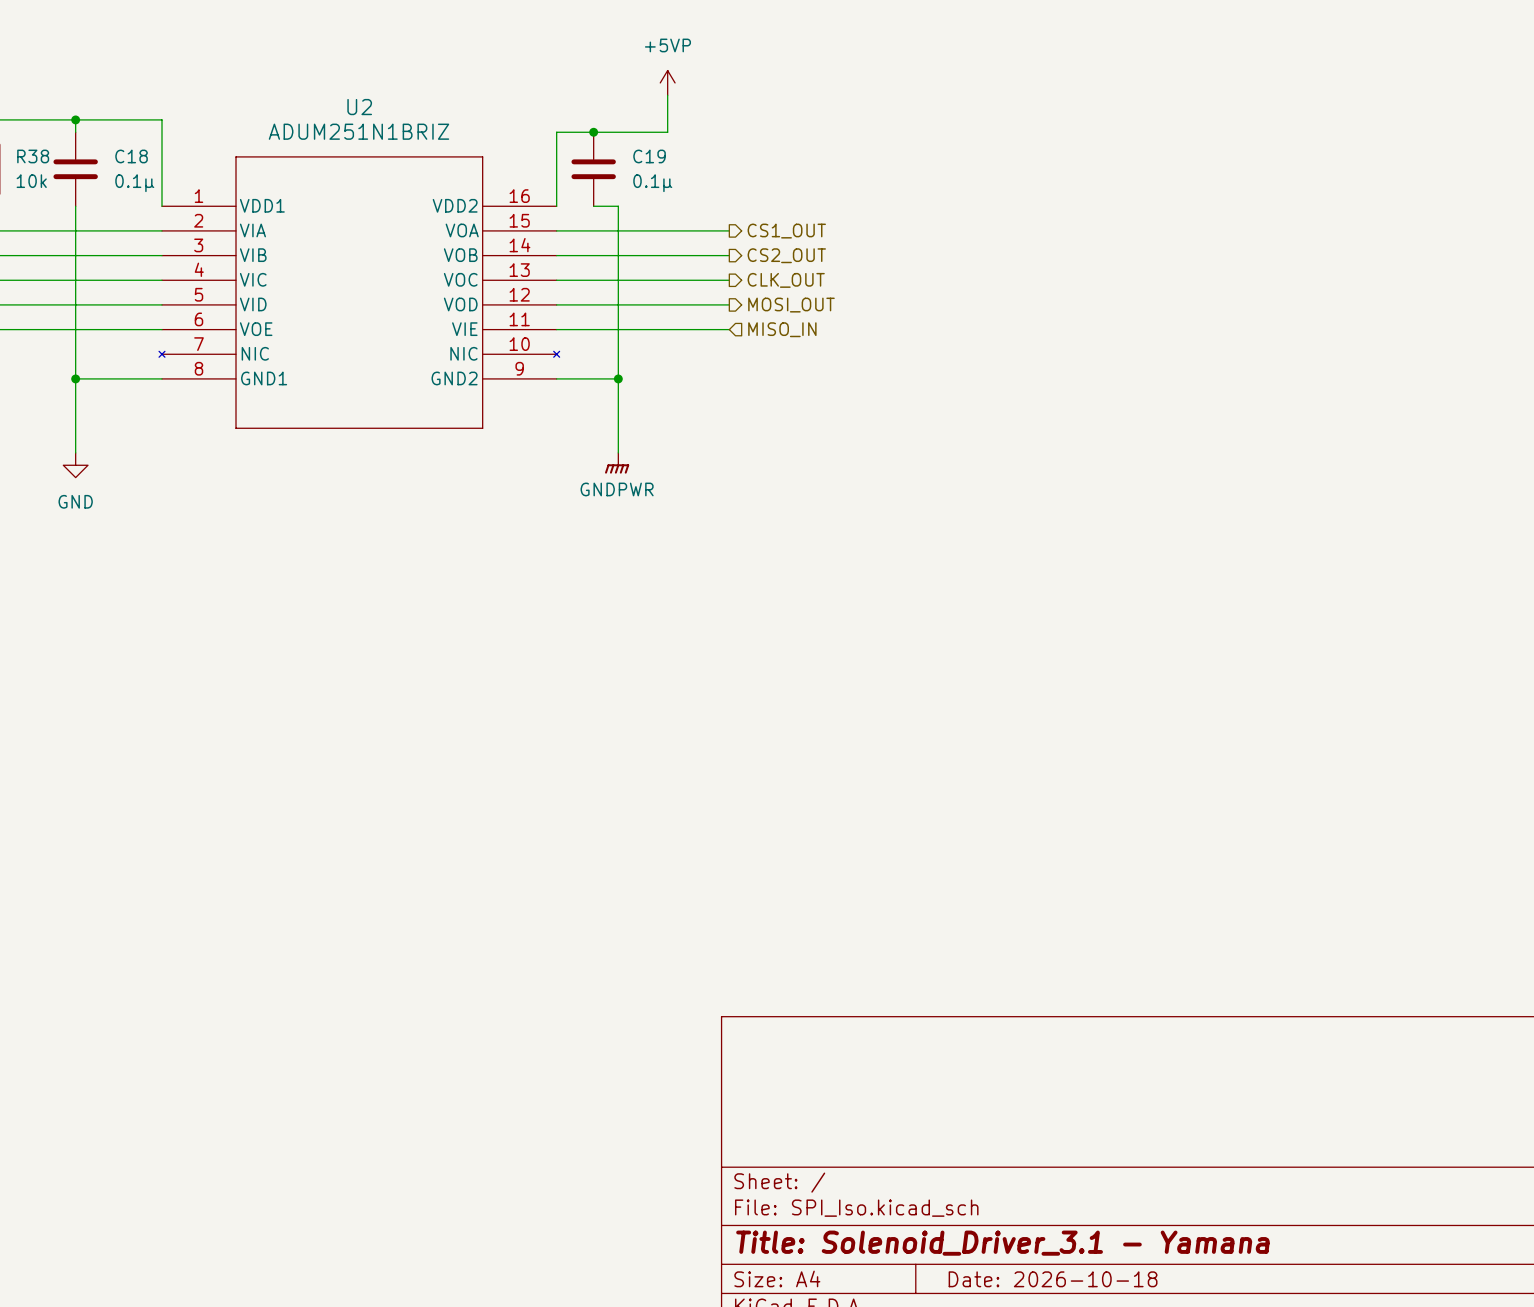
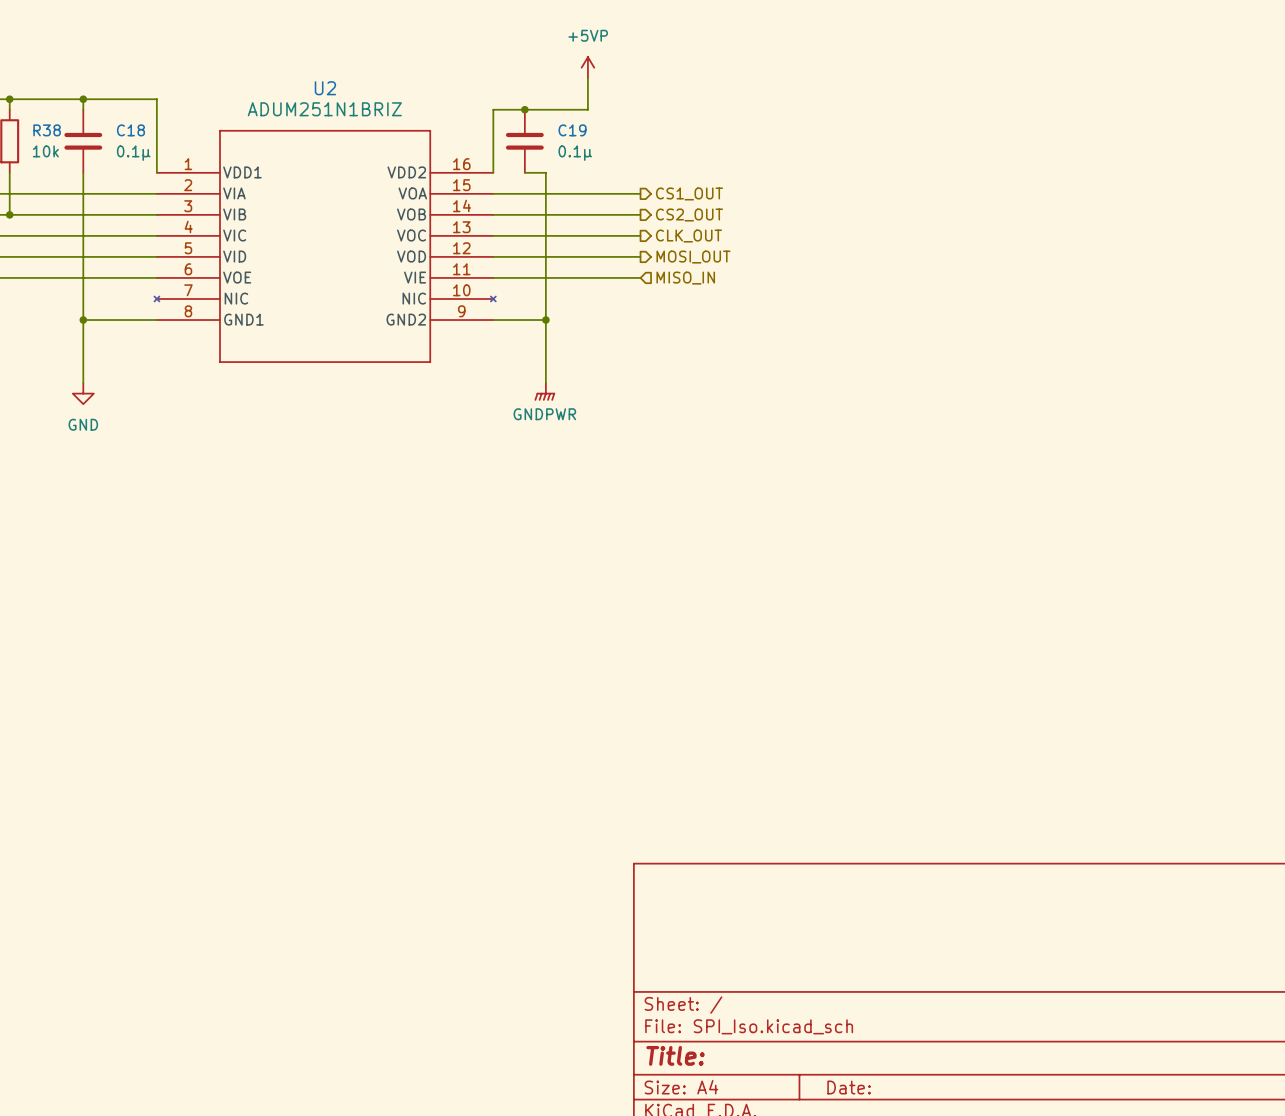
title block: Title: Solenoid_Driver_3.1 - Yamana (1002, 1243) -> Title: (675, 1055)
title block: Date: 2026-10-18 (1053, 1279) -> Date: (849, 1087)

